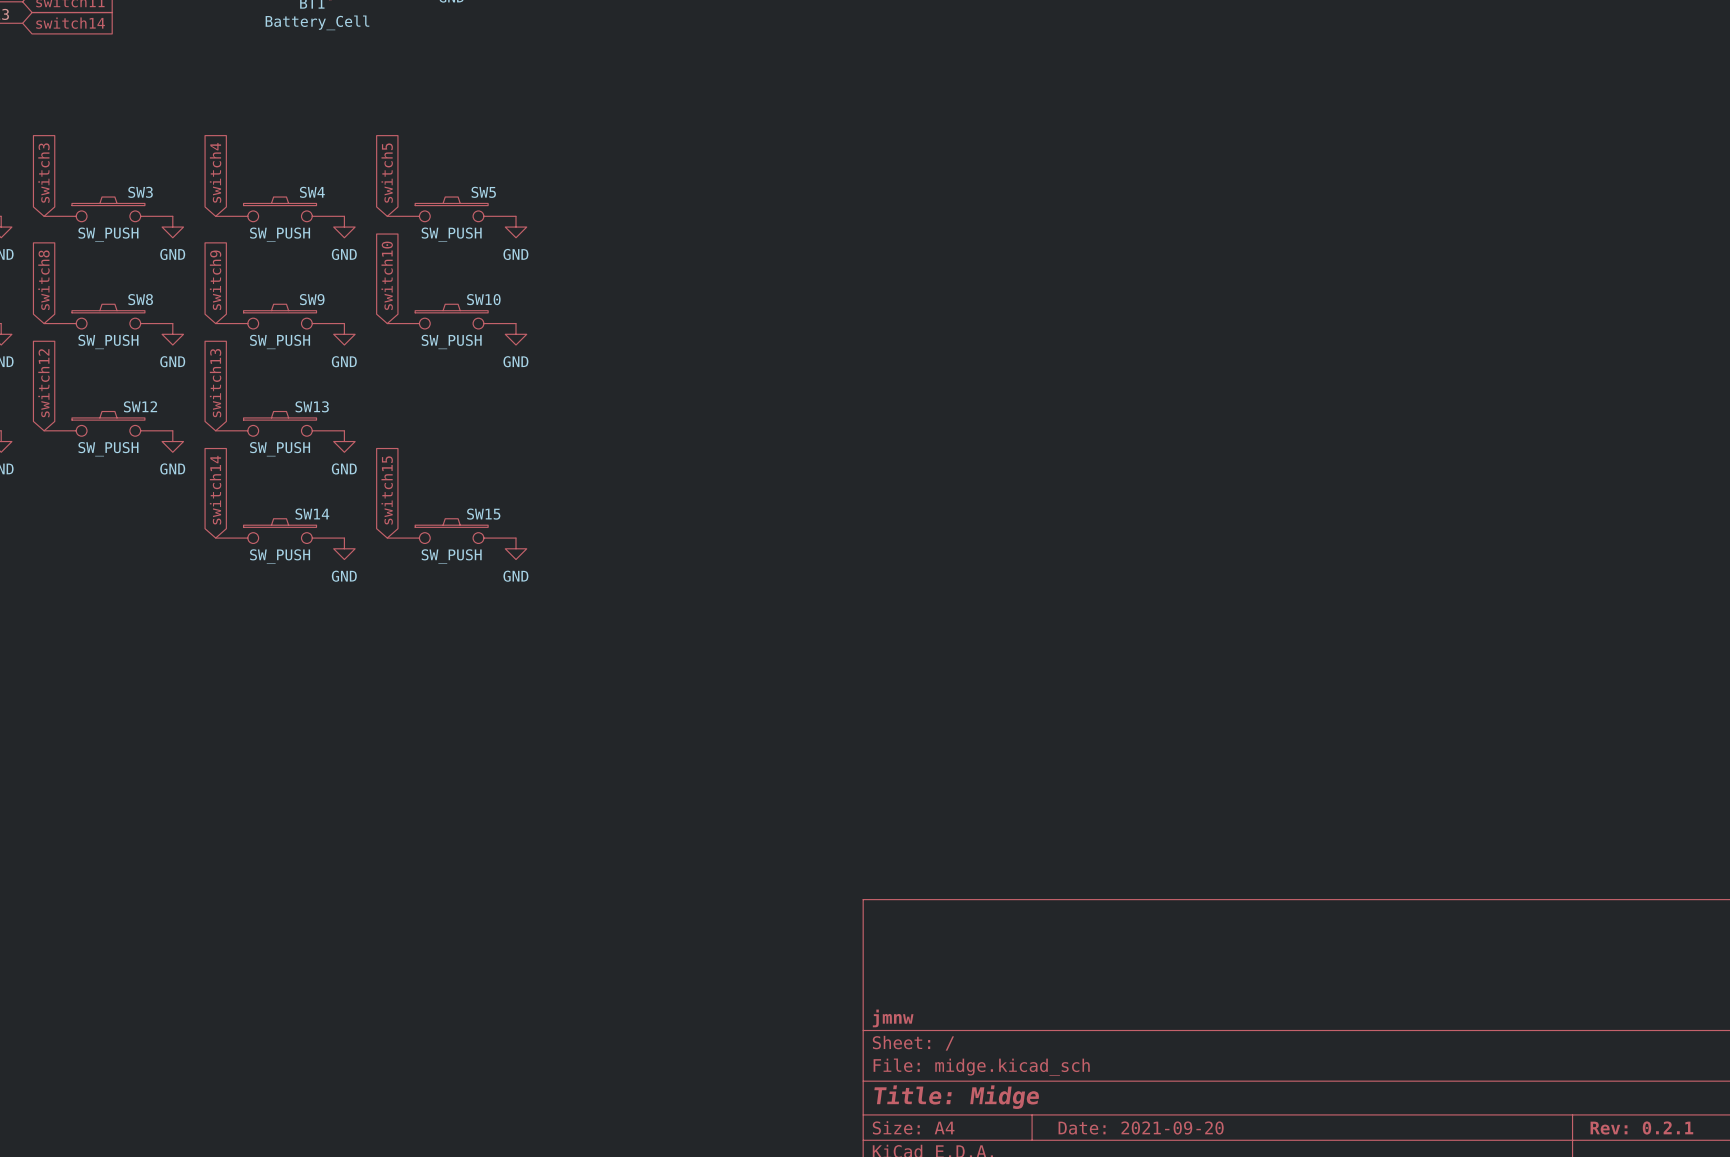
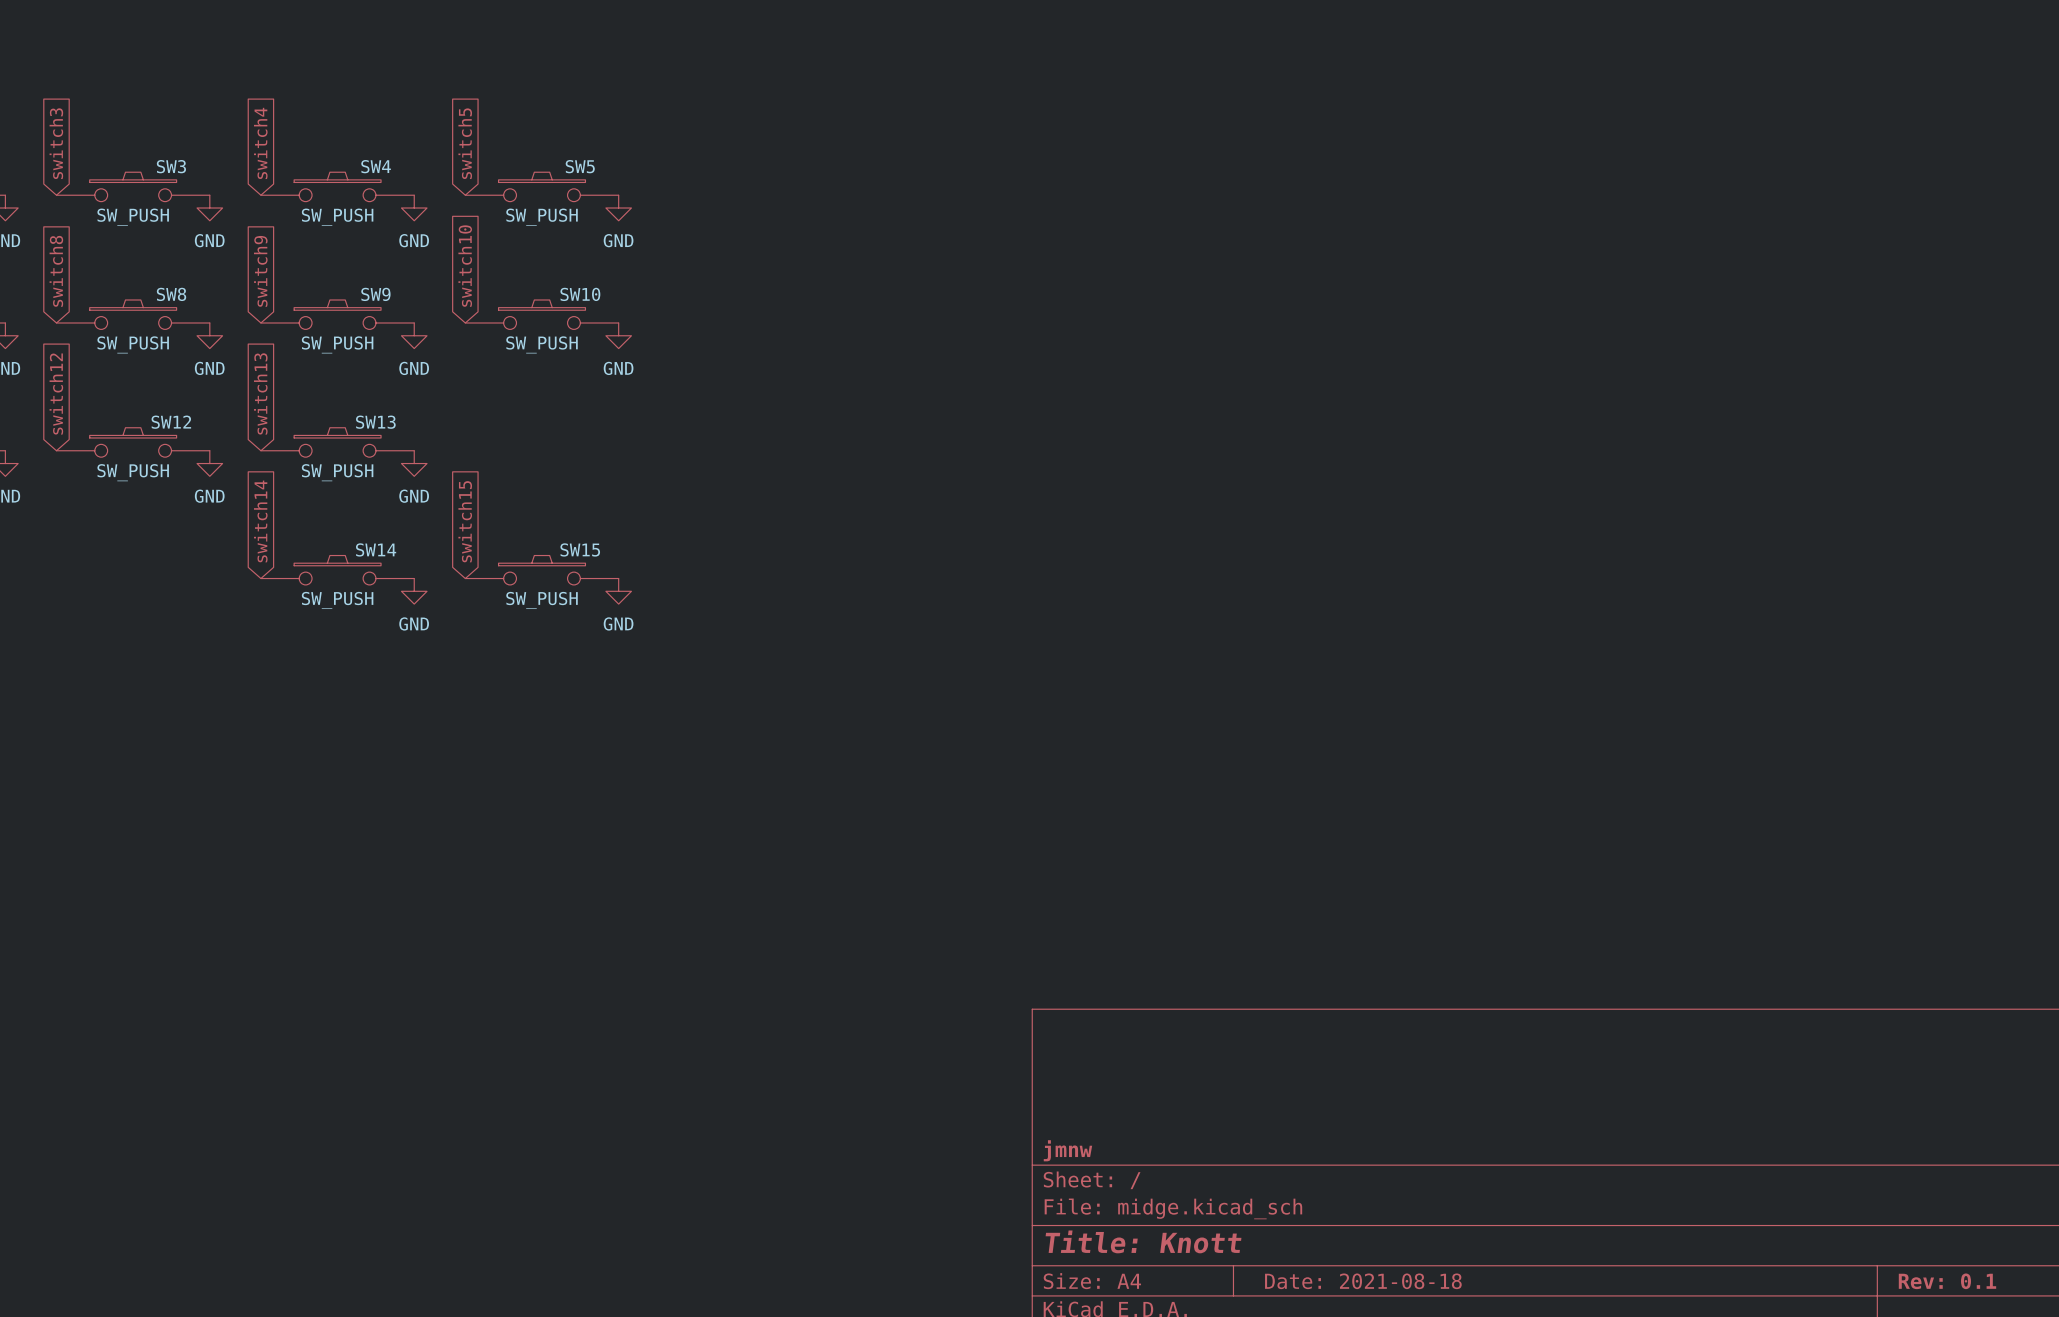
title block: Title: Midge (956, 1097) -> Title: Knott (1143, 1241)
title block: Date: 2021-09-20 (1141, 1127) -> Date: 2021-08-18 (1363, 1281)
title block: Rev: 0.2.1 (1641, 1127) -> Rev: 0.1 (1947, 1281)

